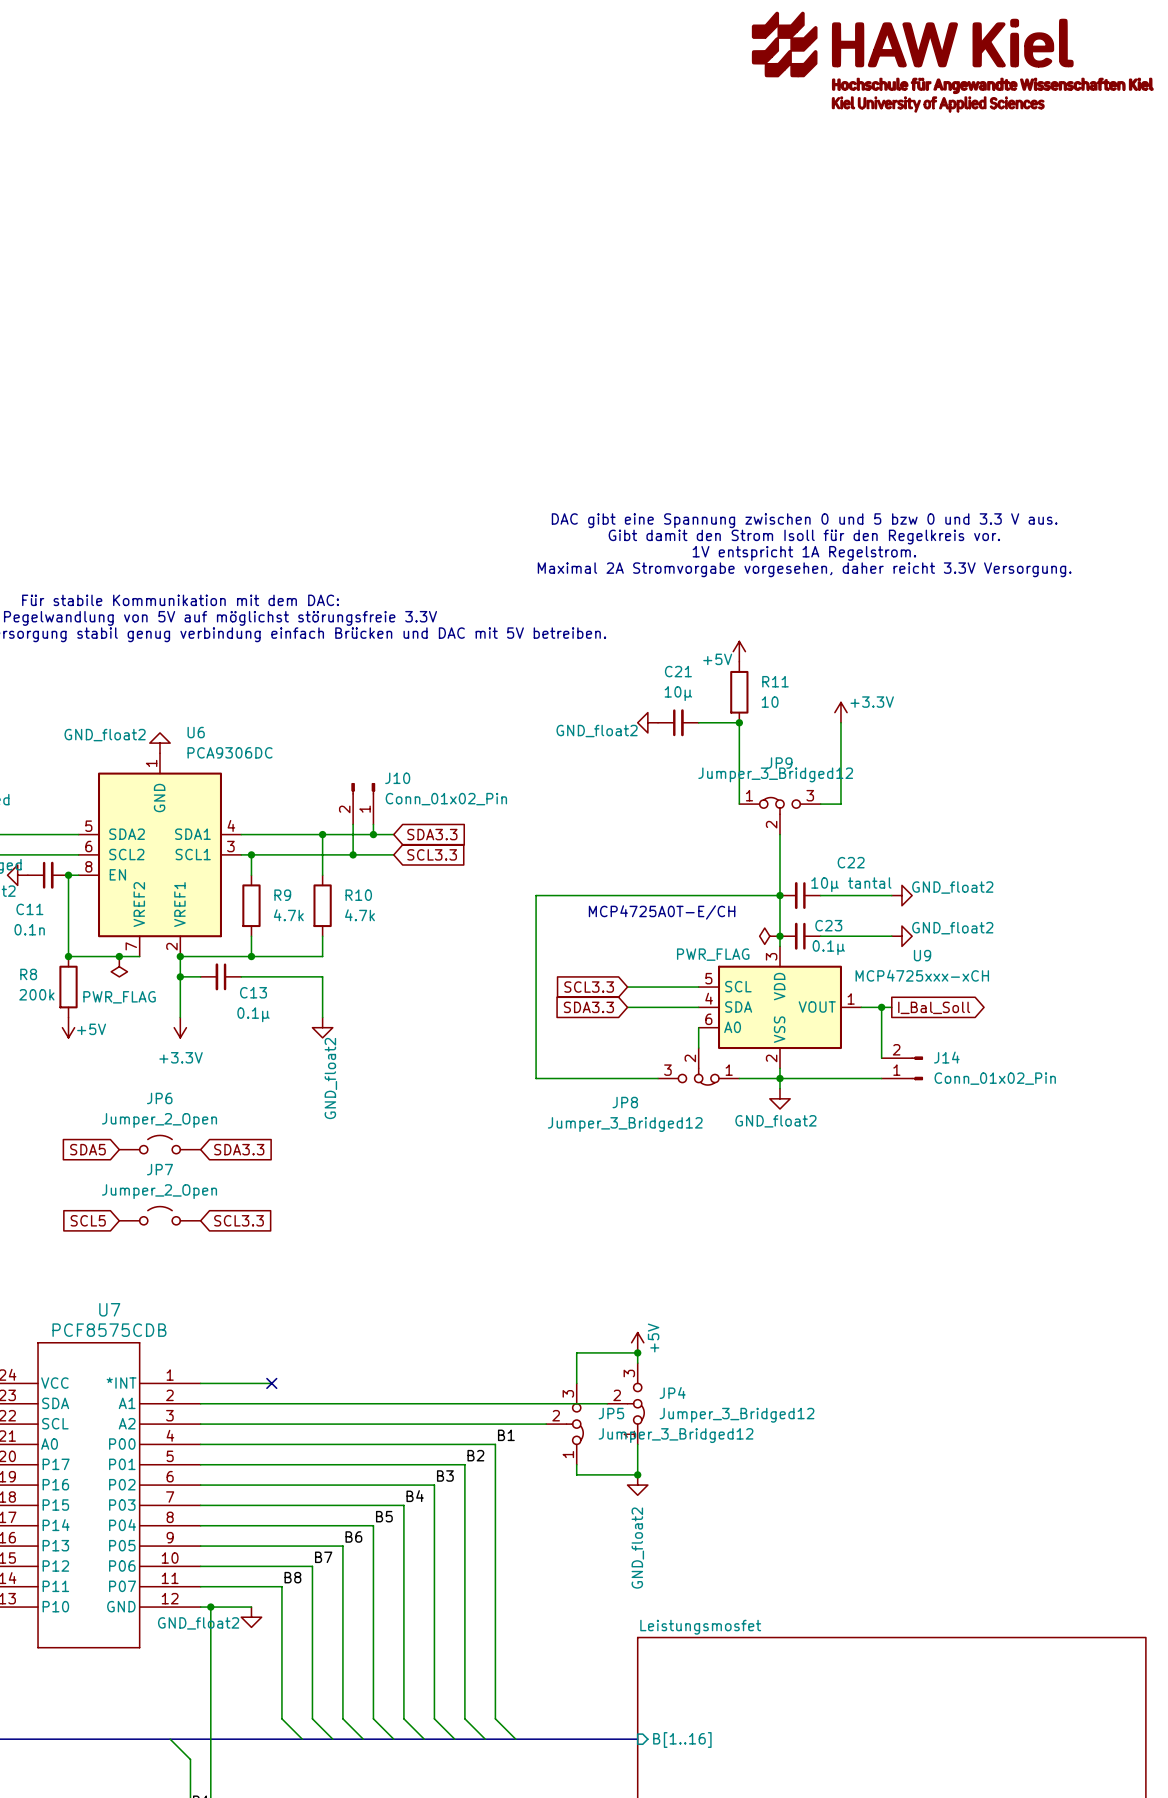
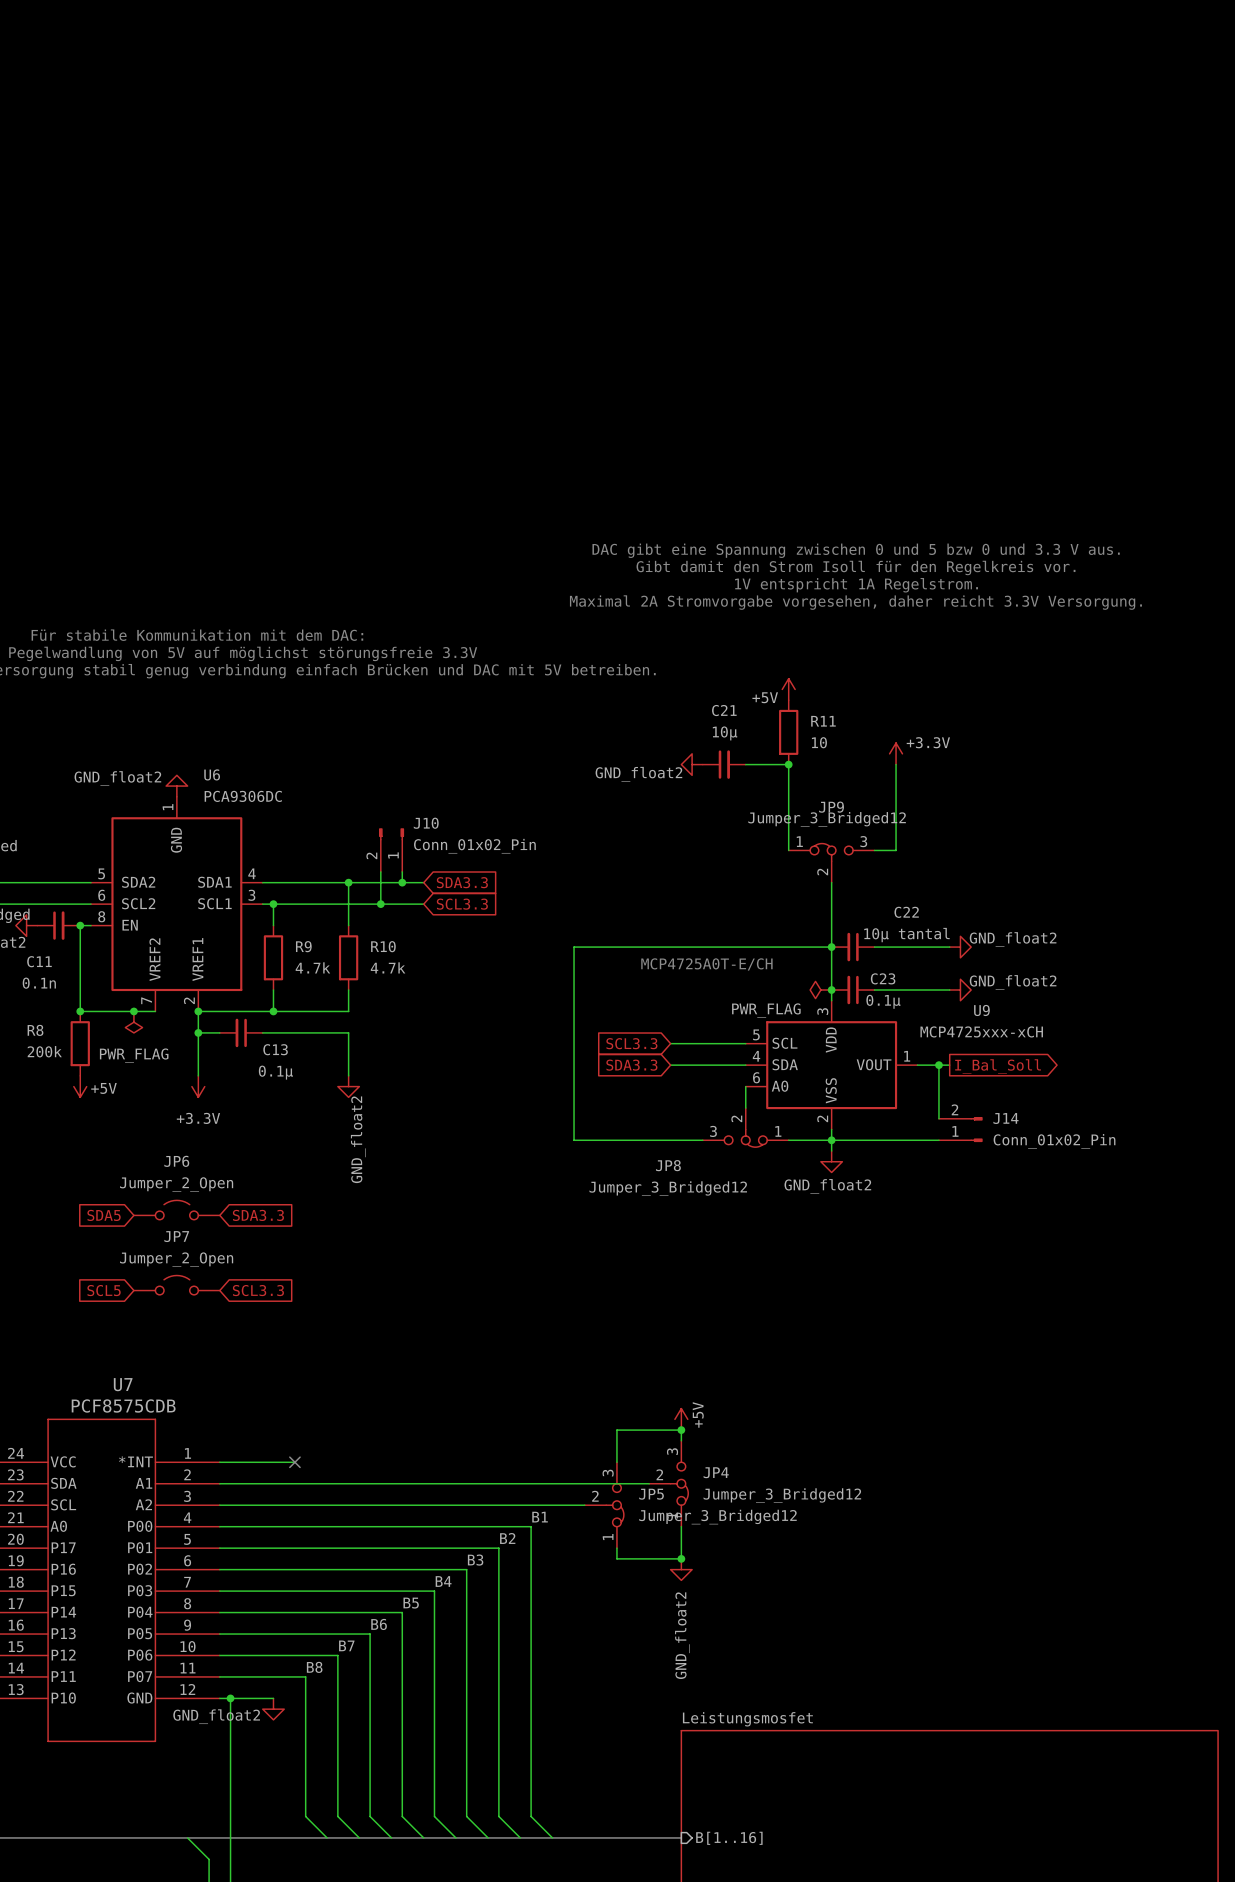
power symbol: (952, 62) -> none

